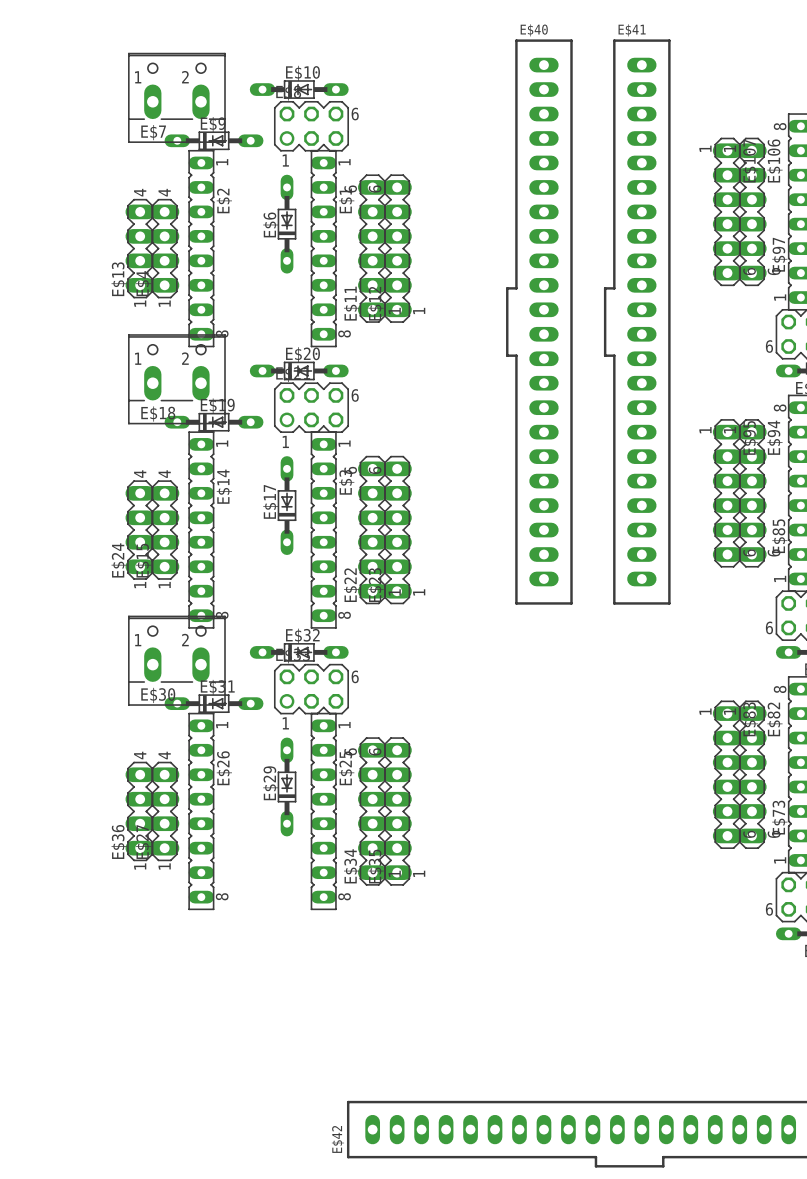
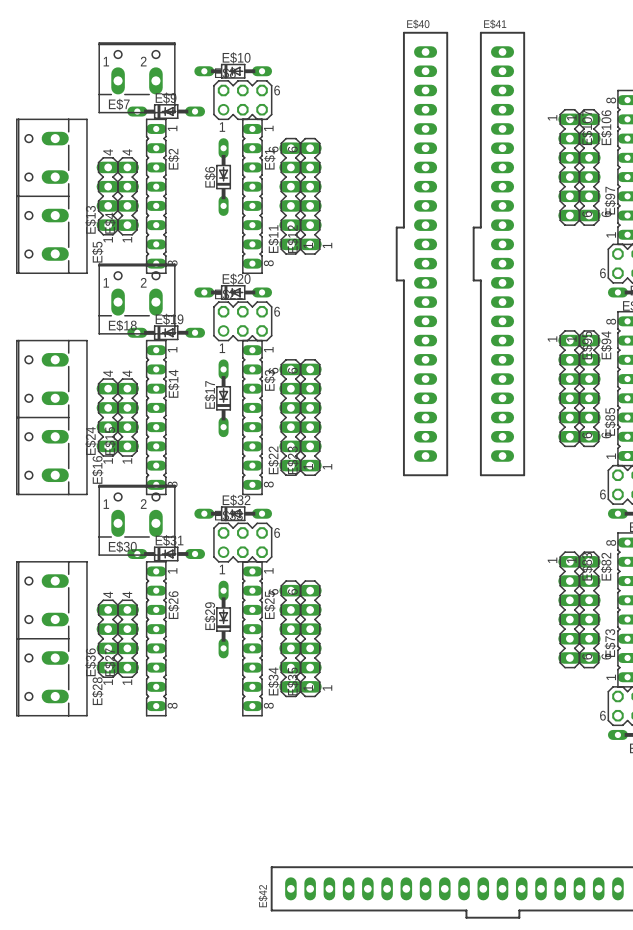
E$5: none -> (51, 196)
E$16: none -> (51, 417)
E$28: none -> (51, 638)

